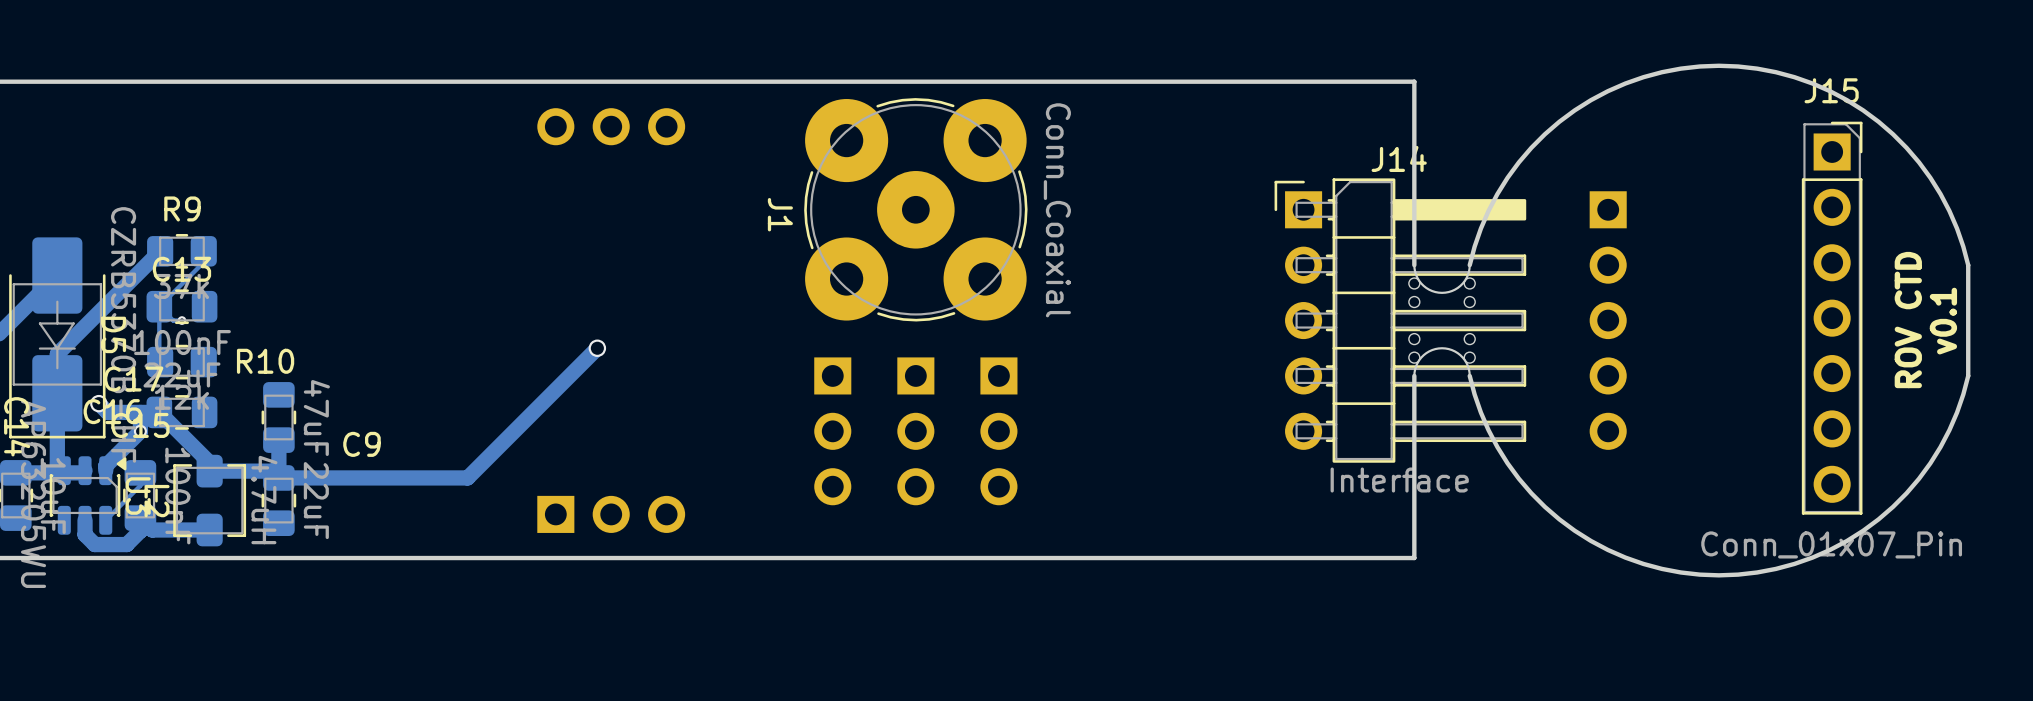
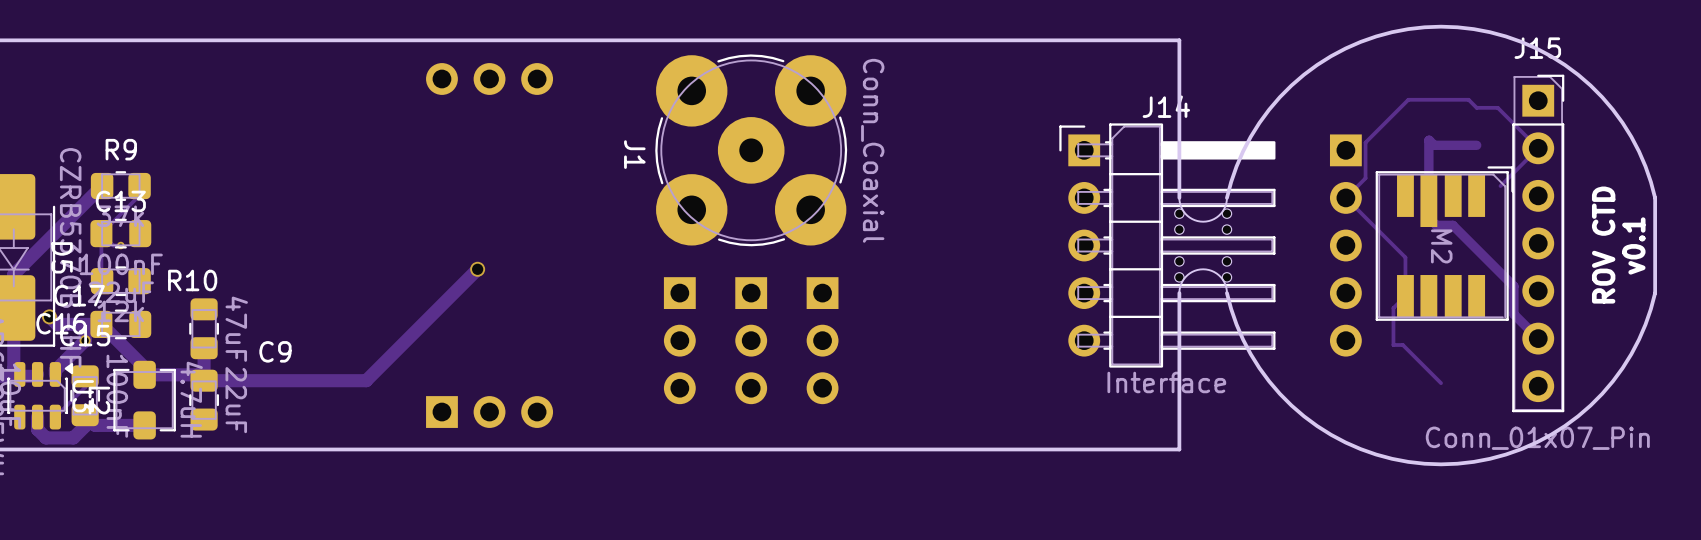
track: none -> (1476, 145) (1434, 145) (1428, 140) (1428, 217) (1436, 225) (1452, 225) (1513, 286) (1513, 314) (1538, 338)
track: none -> (1500, 186) (1538, 148) (1497, 107) (1476, 107) (1468, 99) (1408, 99) (1365, 142) (1365, 178) (1345, 197) (1405, 257) (1405, 296) (1393, 308) (1393, 345) (1402, 345) (1441, 383)
M2: none -> (1444, 243)

